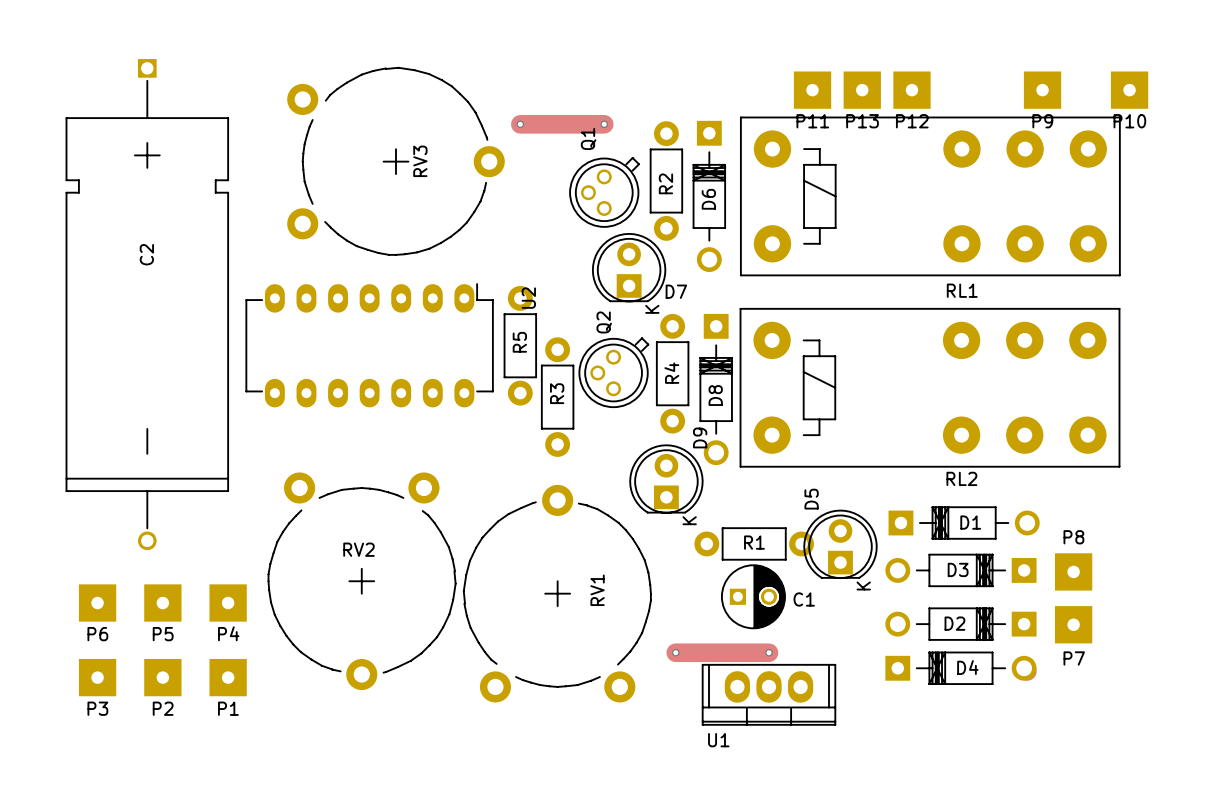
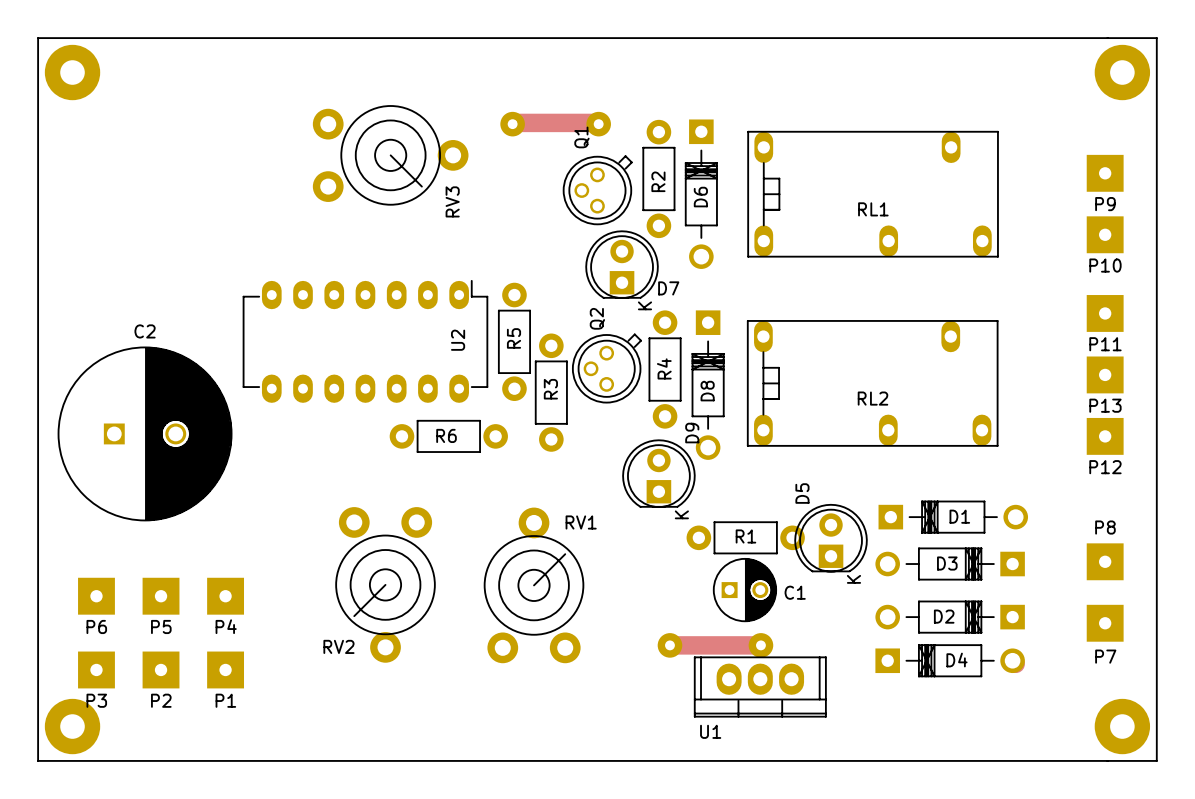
board edge: none -> (38, 38) (1156, 38) (1156, 760) (38, 760) (38, 38)
C2 footprint: [65, 59, 230, 551] -> [57, 346, 233, 522]
RV3 footprint: [287, 66, 505, 256] -> [312, 105, 469, 206]
part: none -> (72, 72)
part: none -> (1122, 72)
P11 position: (812, 90) -> (1105, 313)
P13 position: (862, 90) -> (1105, 374)
P12 position: (911, 90) -> (1105, 436)
P9 position: (1042, 90) -> (1105, 173)
P10 position: (1129, 90) -> (1105, 234)
RL1 footprint: [739, 116, 1121, 277] -> [747, 130, 999, 258]
part: none -> (512, 124)
part: none -> (598, 124)
RV3 name position: RV3 (420, 161) -> RV3 (452, 201)
C2 name position: C2 (146, 254) -> C2 (145, 331)
RL1 name position: RL1 (962, 290) -> RL1 (873, 209)
U2 name position: U2 (528, 298) -> U2 (458, 340)
RL2 footprint: [739, 307, 1121, 468] -> [746, 320, 999, 447]
R6: none -> (448, 436)
RV2 footprint: [267, 472, 457, 691] -> [335, 507, 436, 663]
RL2 name position: RL2 (961, 478) -> RL2 (872, 398)
RV1 footprint: [462, 484, 652, 703] -> [483, 507, 585, 664]
RV2 name position: RV2 (358, 549) -> RV2 (338, 646)
P8 position: (1073, 571) -> (1105, 561)
RV1 name position: RV1 (597, 590) -> RV1 (581, 522)
P7 position: (1073, 624) -> (1105, 623)
part: none -> (669, 645)
part: none -> (760, 645)
part: none -> (72, 726)
part: none -> (1122, 726)

